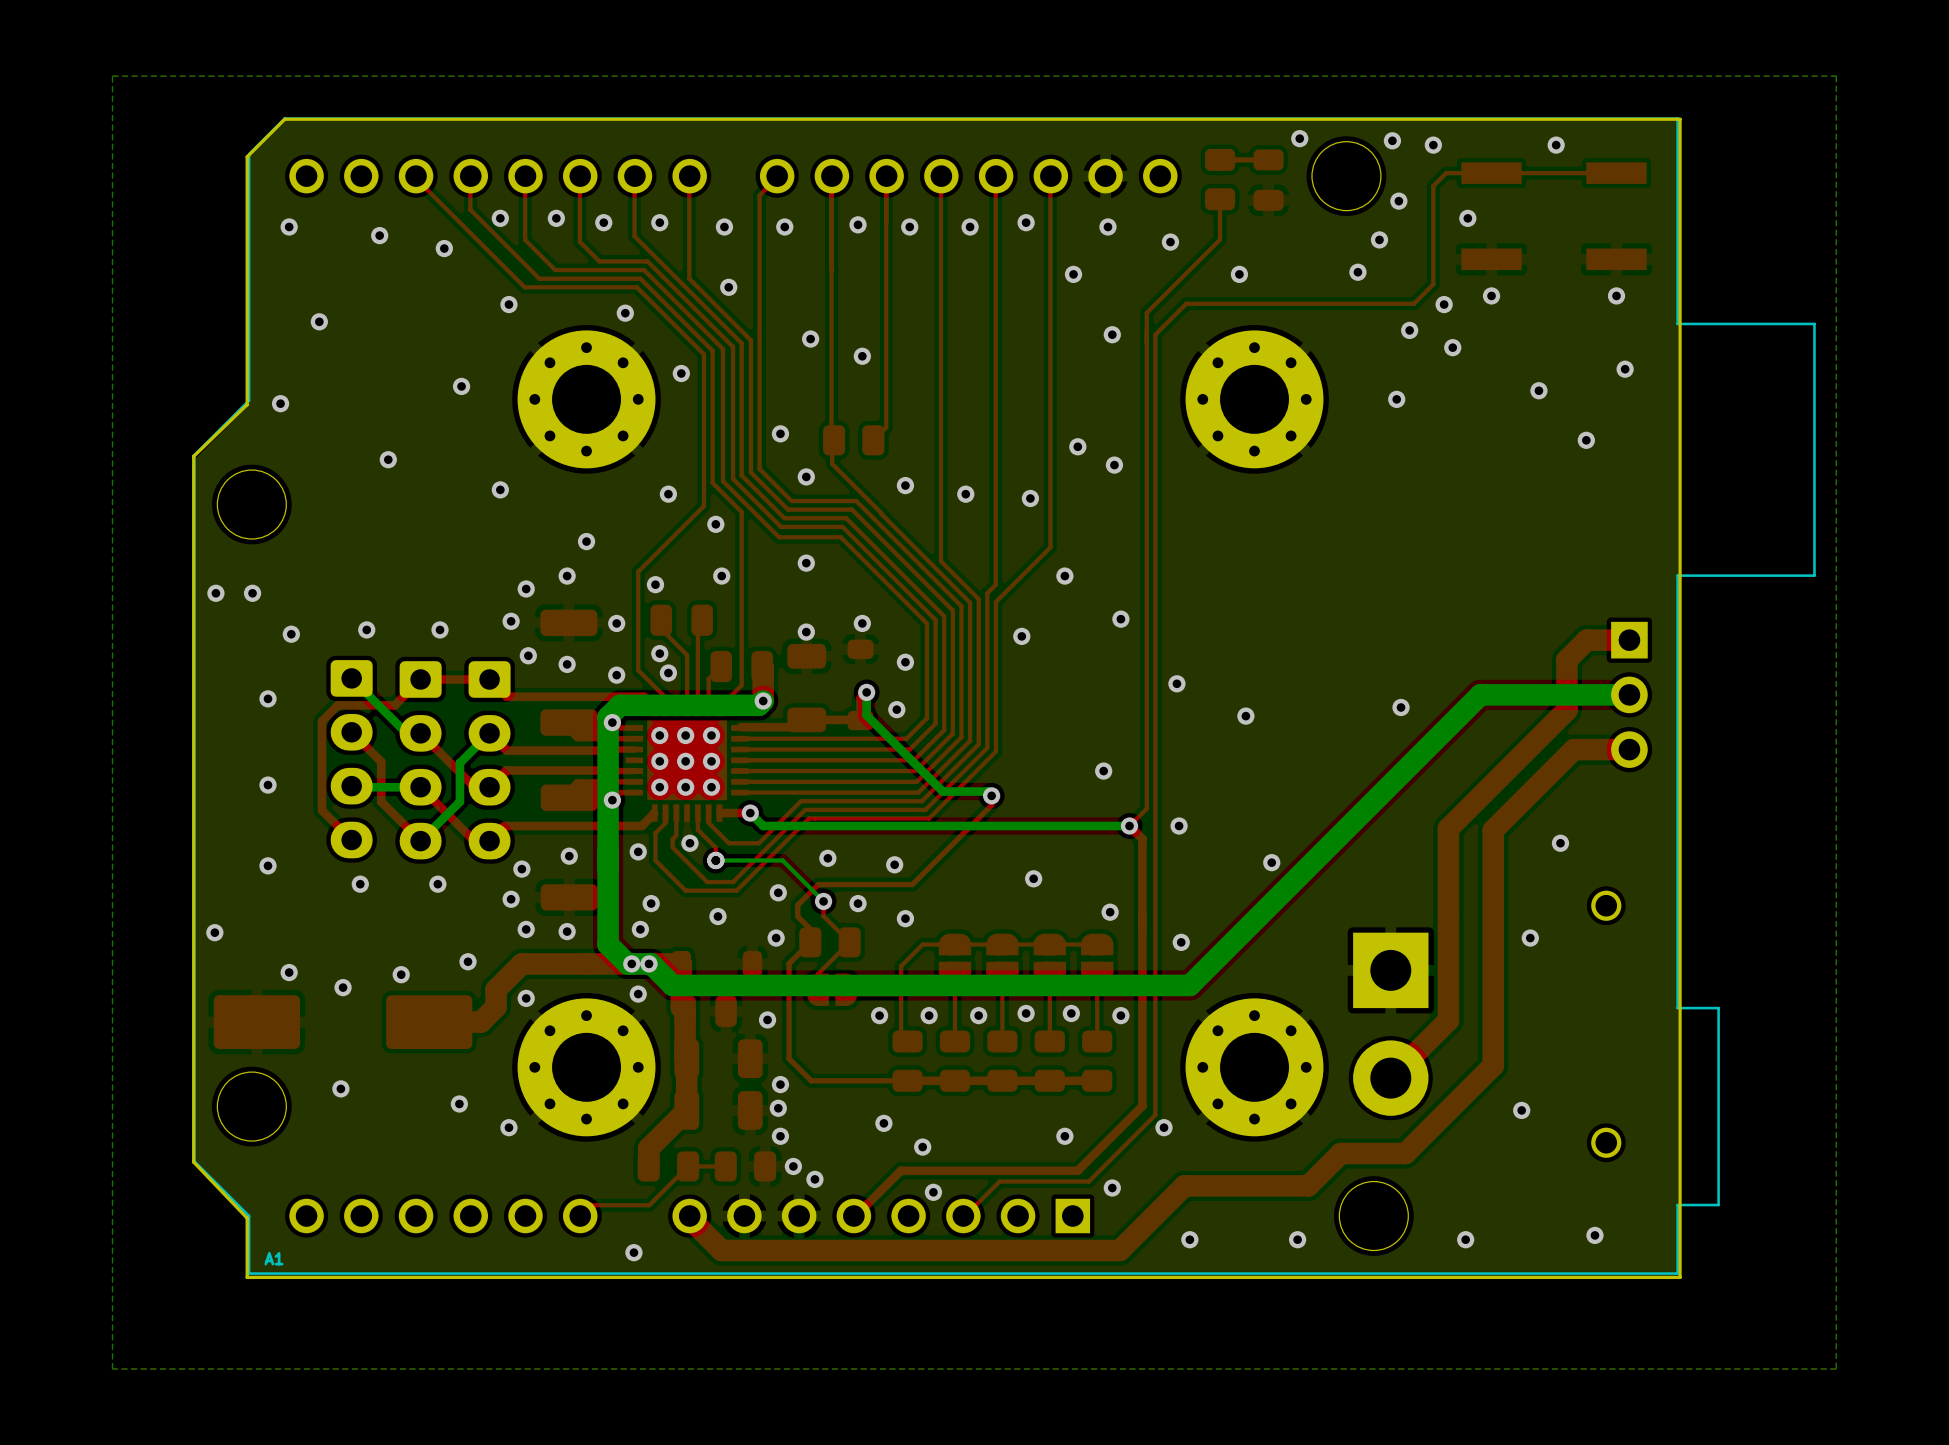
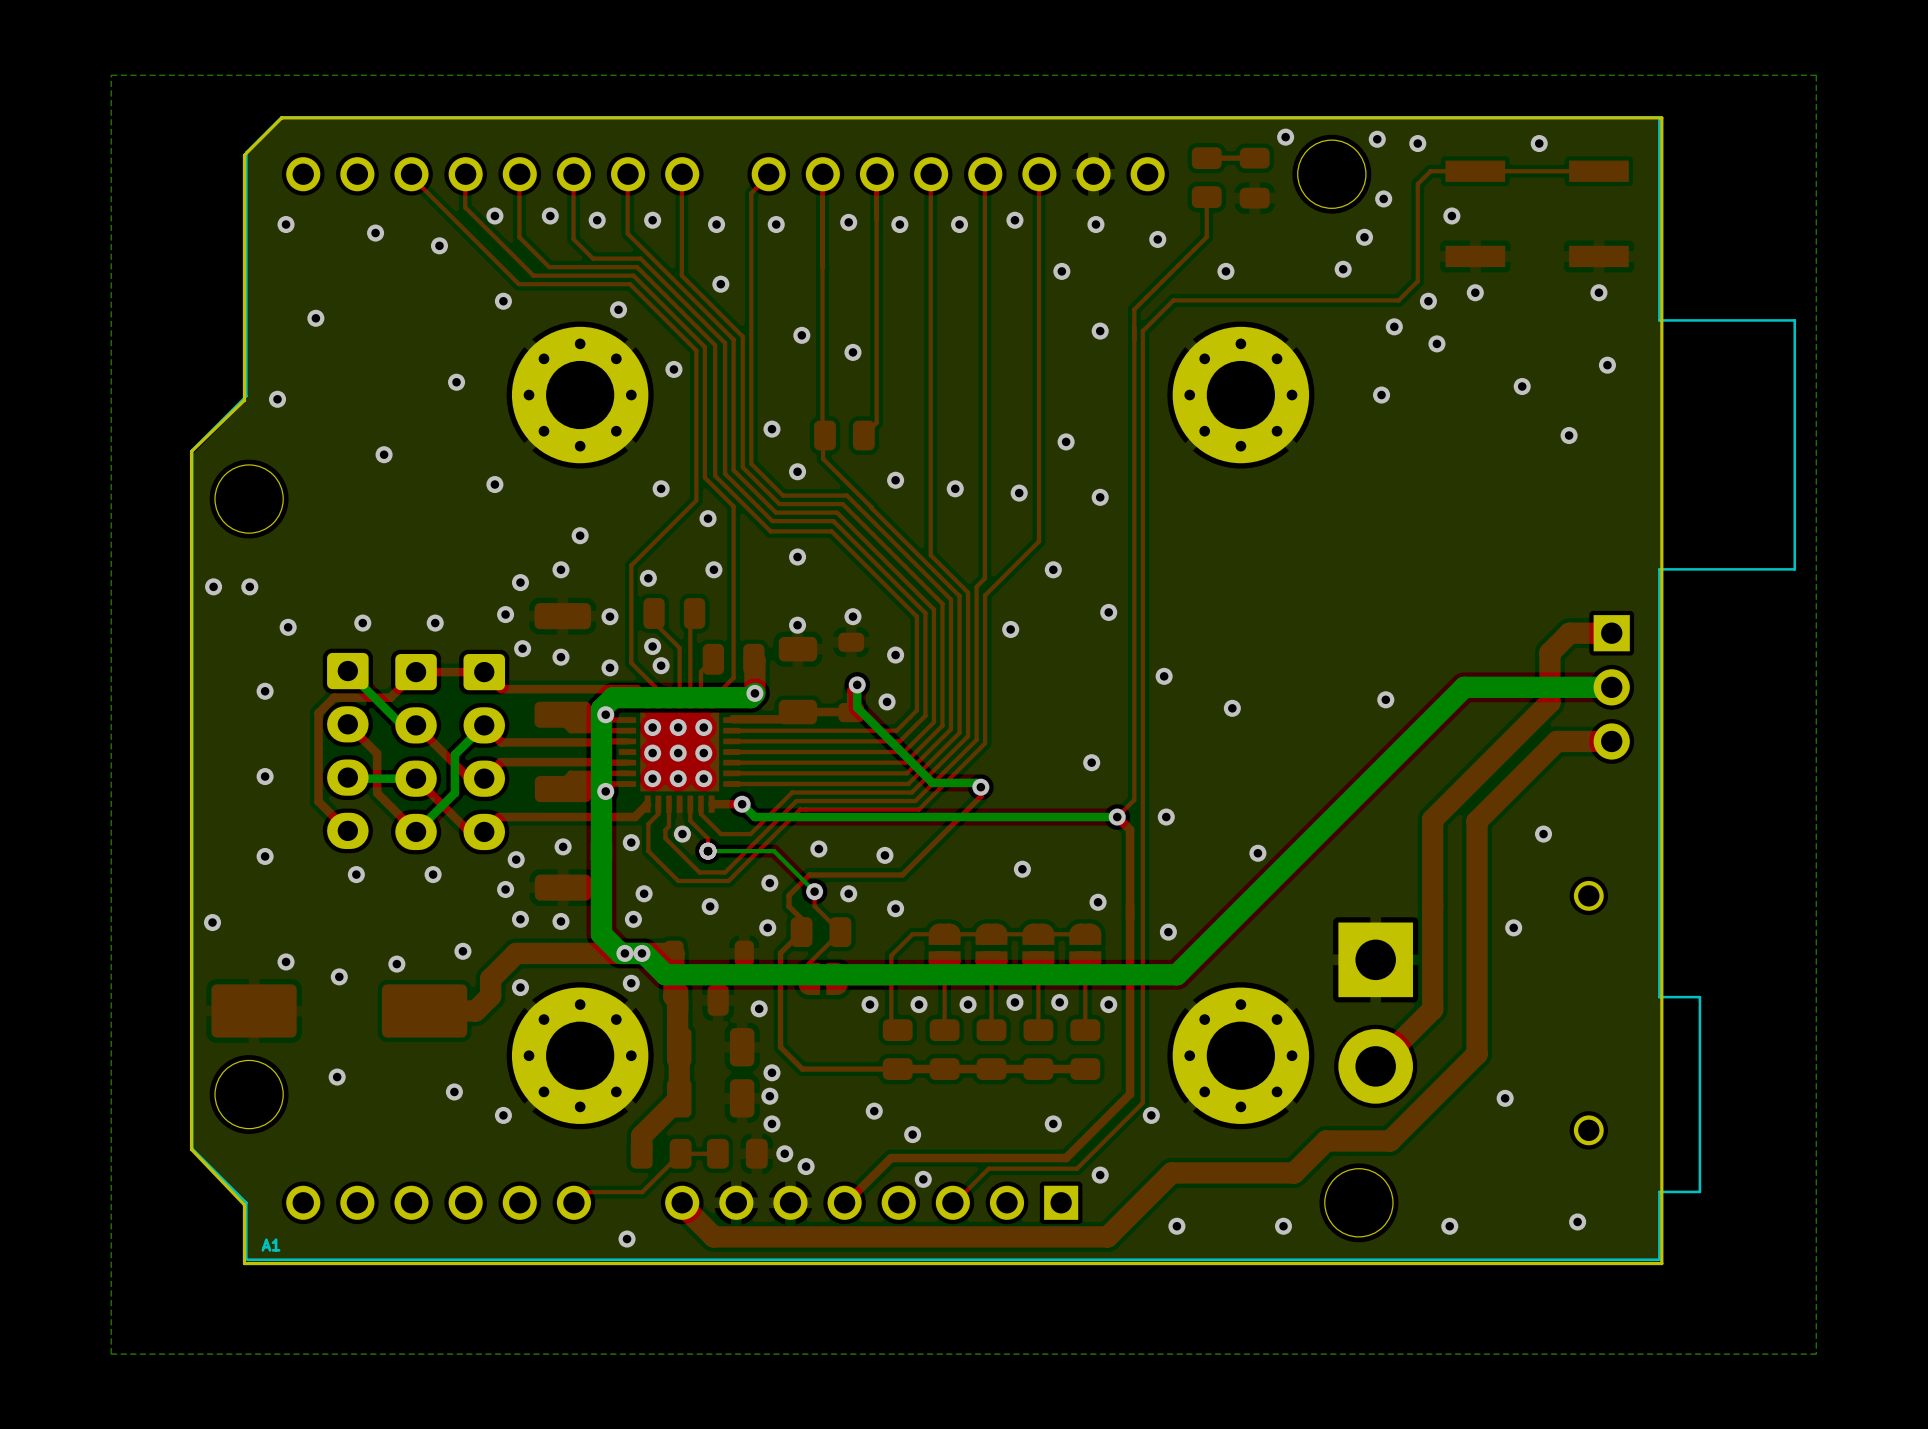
via position: (1114, 465) -> (1100, 497)

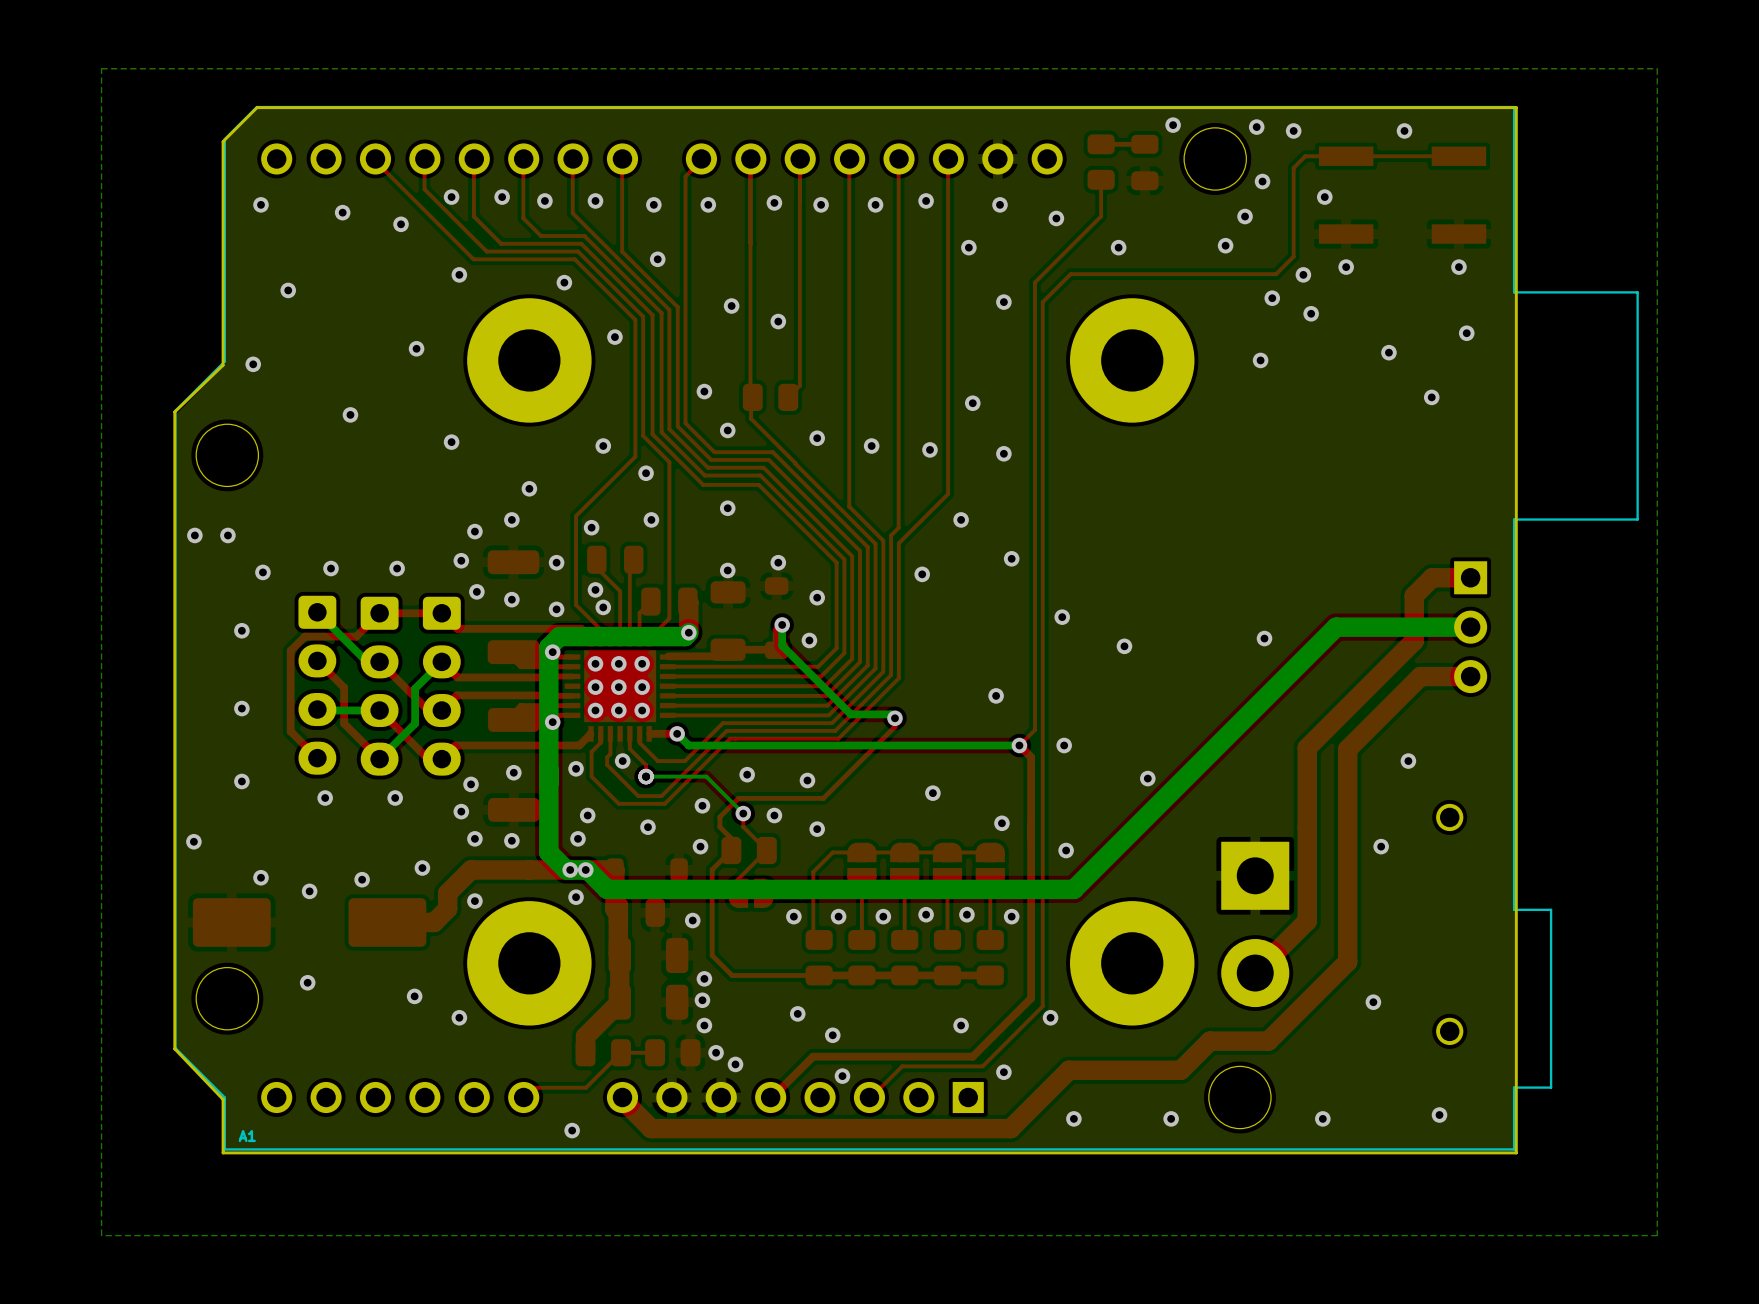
part footprint: [511, 326, 649, 464] -> [467, 298, 592, 423]
part footprint: [1172, 326, 1310, 464] -> [1070, 298, 1195, 423]
part footprint: [511, 987, 649, 1124] -> [467, 901, 592, 1026]
part footprint: [1172, 987, 1310, 1124] -> [1070, 901, 1195, 1026]

